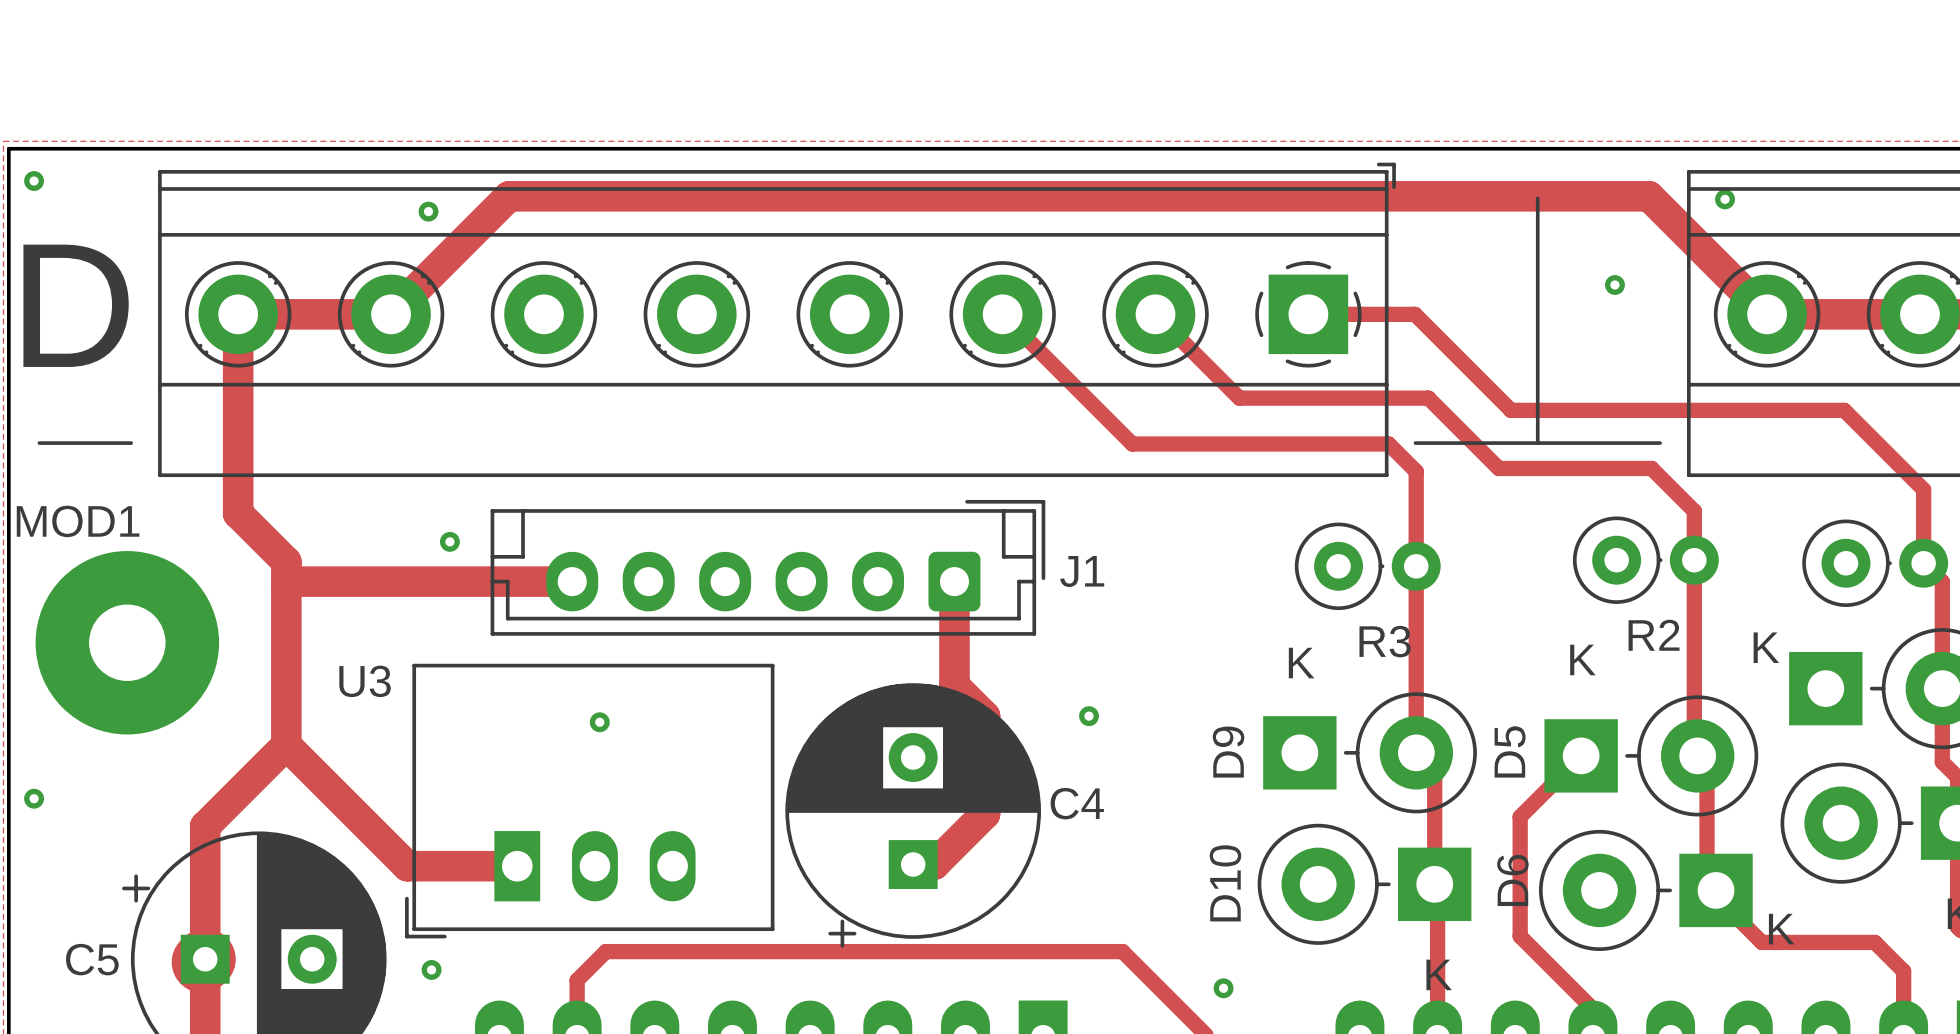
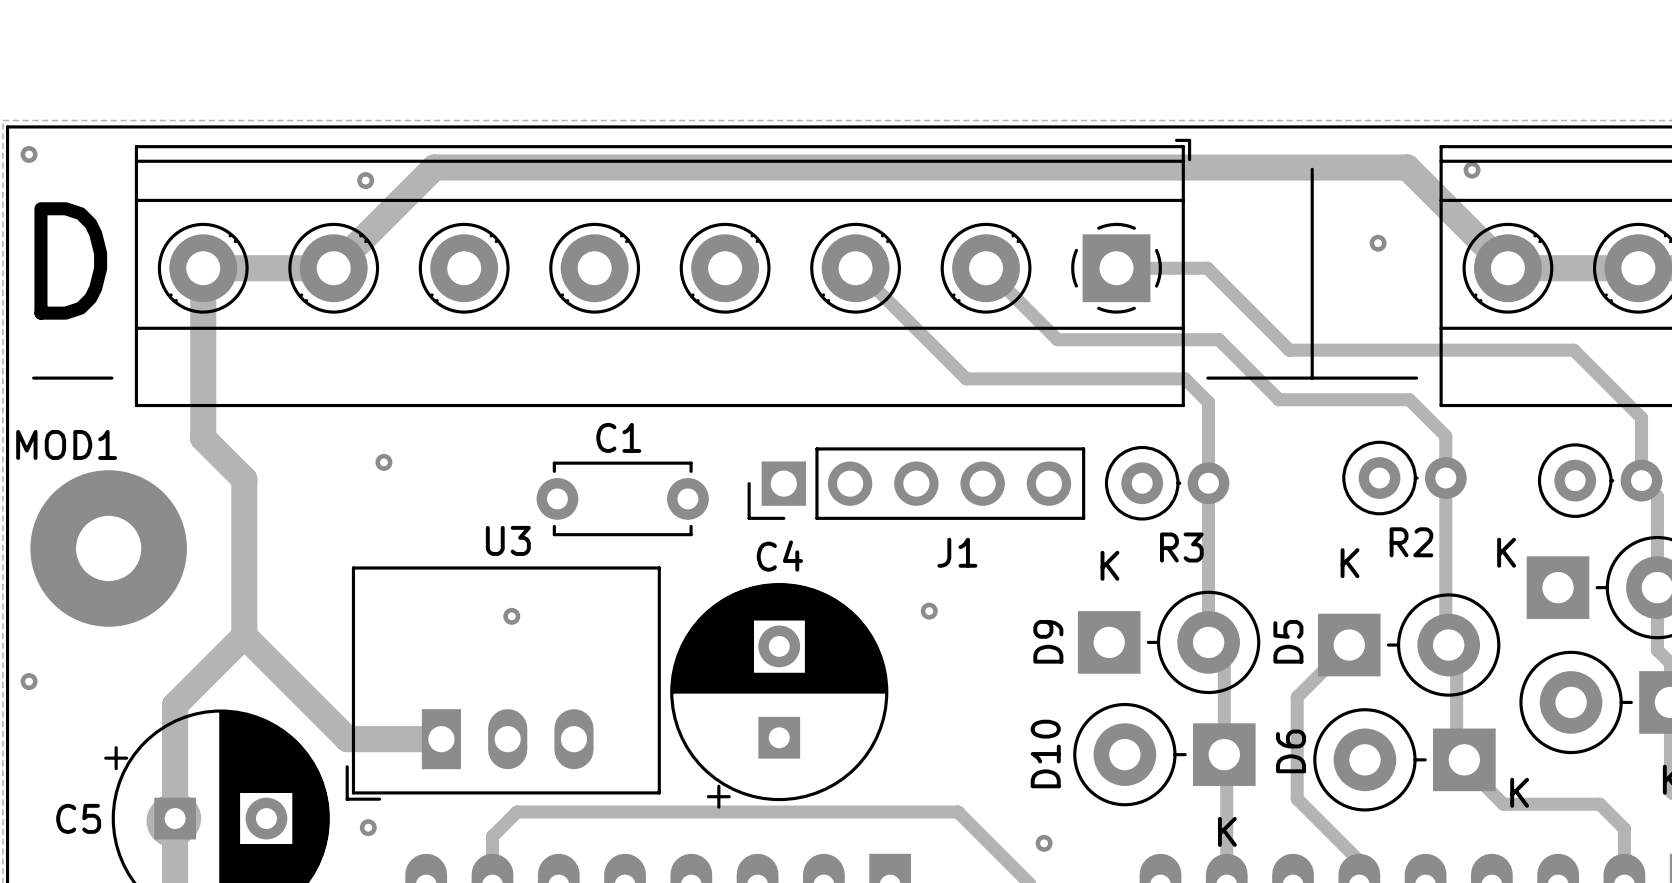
J1 footprint: [490, 499, 1046, 636] -> [747, 447, 1086, 520]
J1 name position: J1 (1082, 571) -> J1 (957, 552)
track: (572, 581) (289, 581) (286, 584) -> none
track: (954, 581) (954, 685) (985, 716) (985, 813) (934, 864) (913, 864) -> none
C1: none -> (622, 498)
U3 name position: U3 (365, 681) -> U3 (508, 540)
C4 name position: C4 (1077, 803) -> C4 (779, 556)

